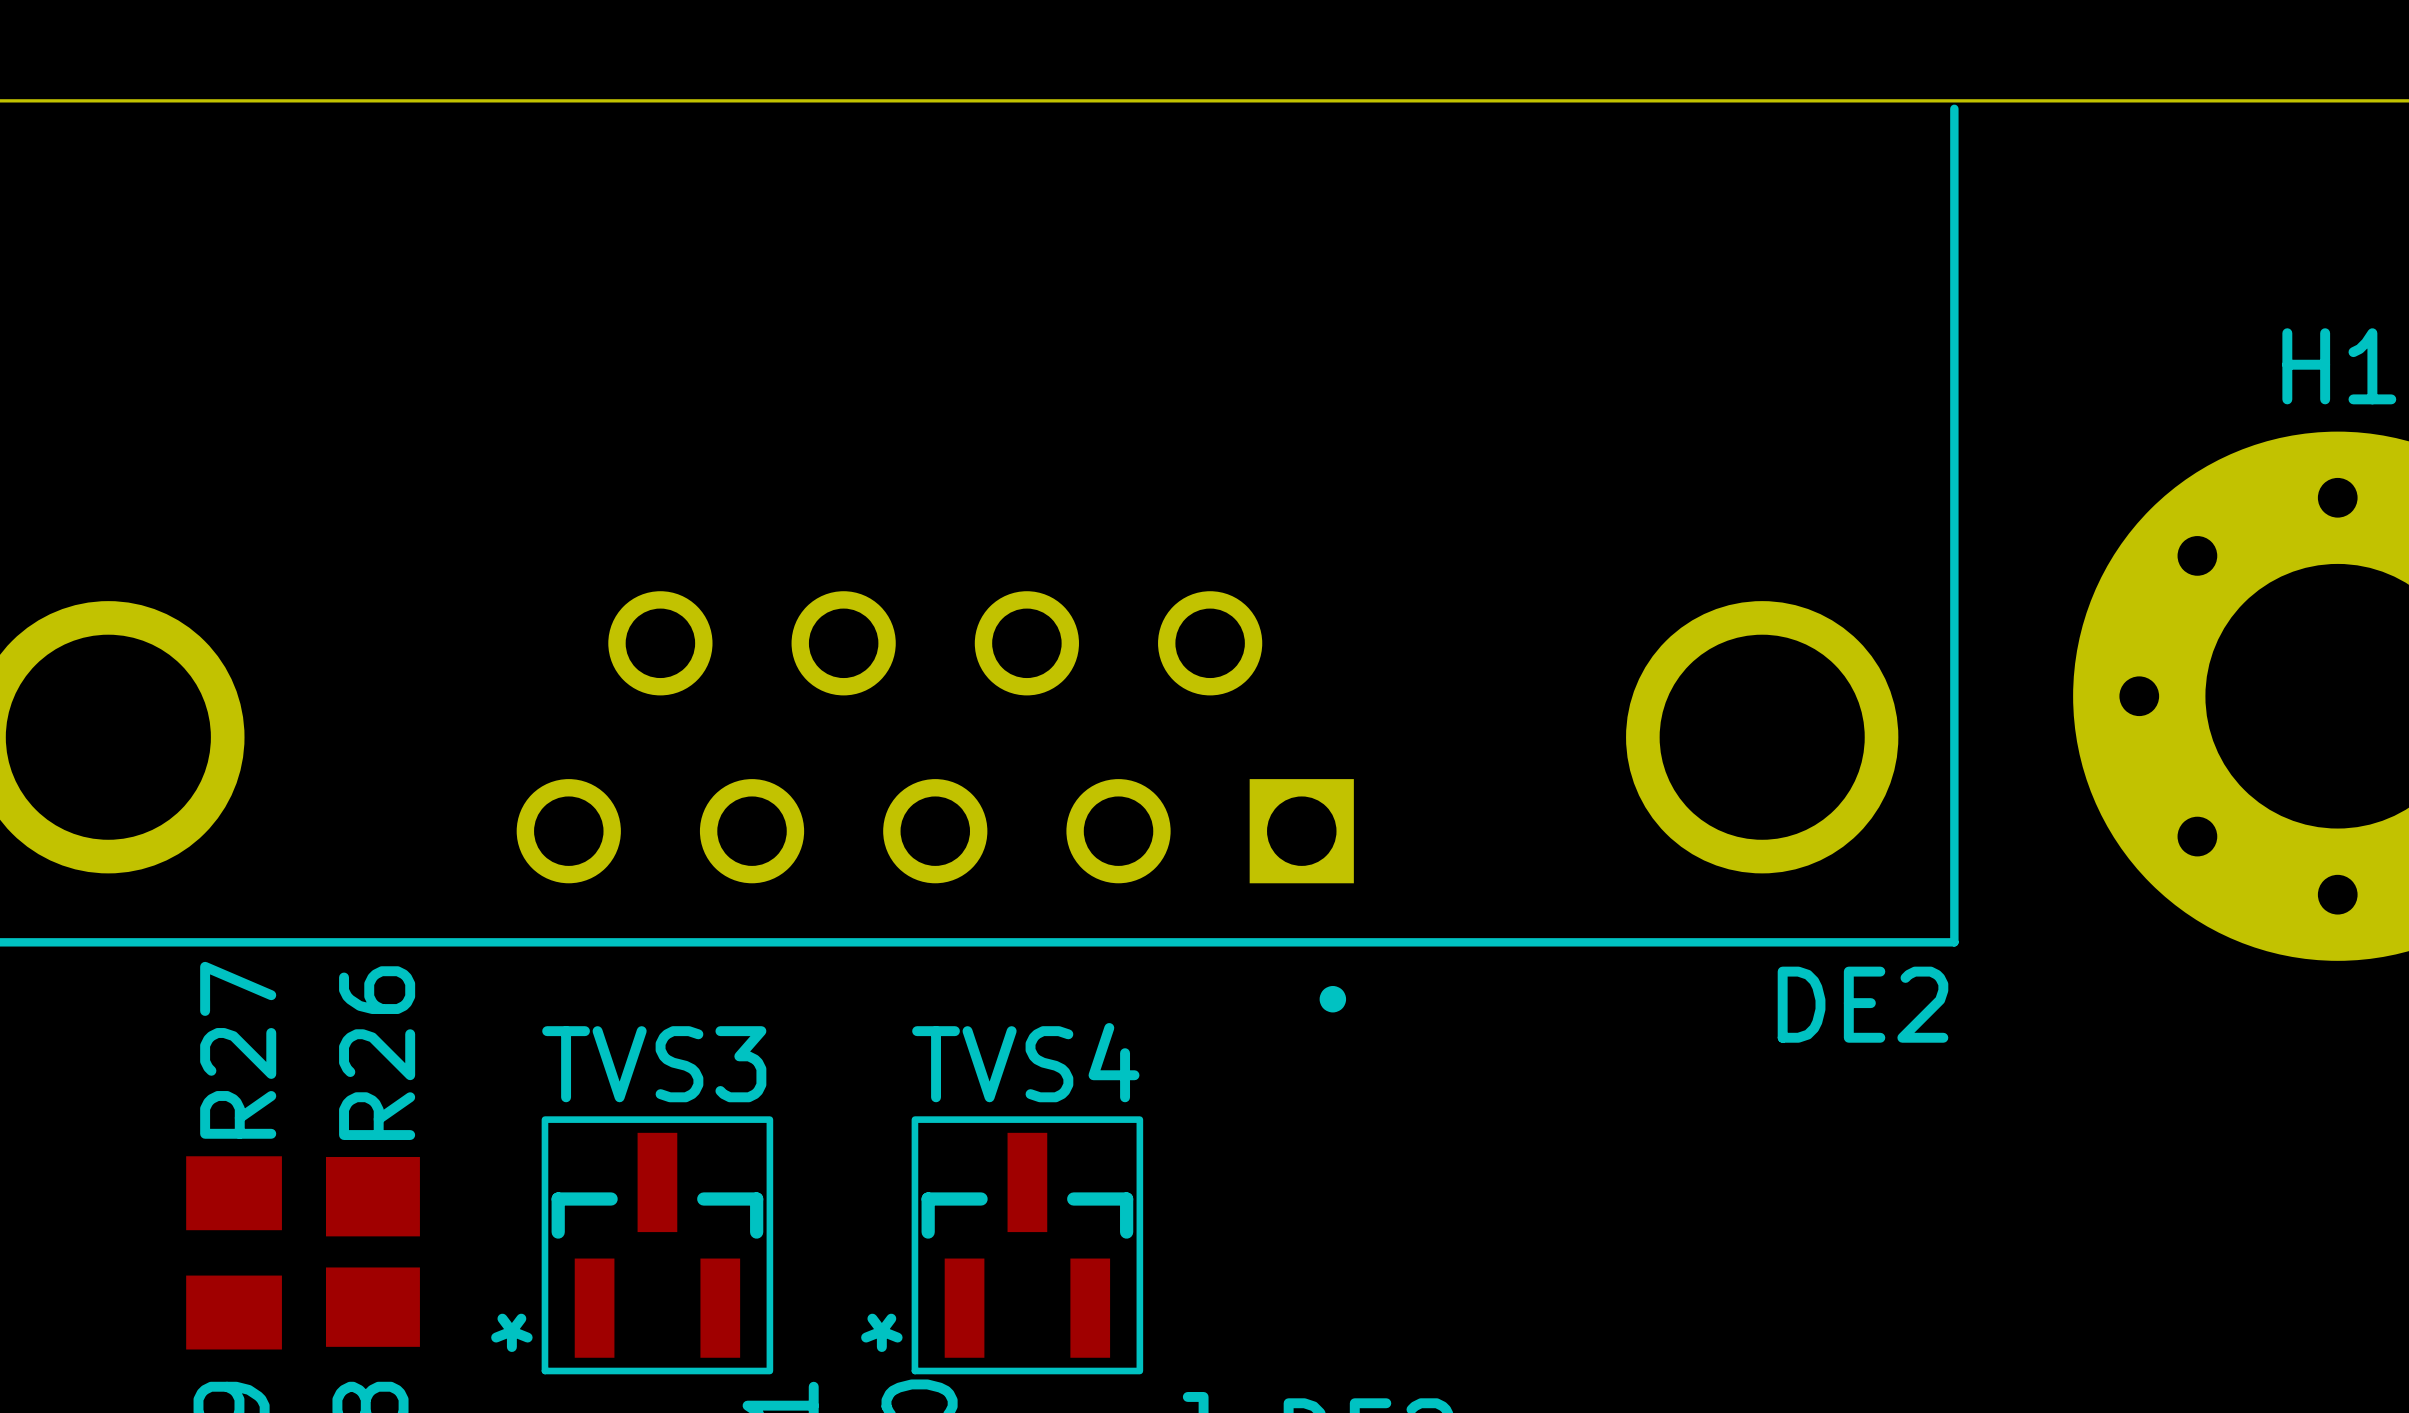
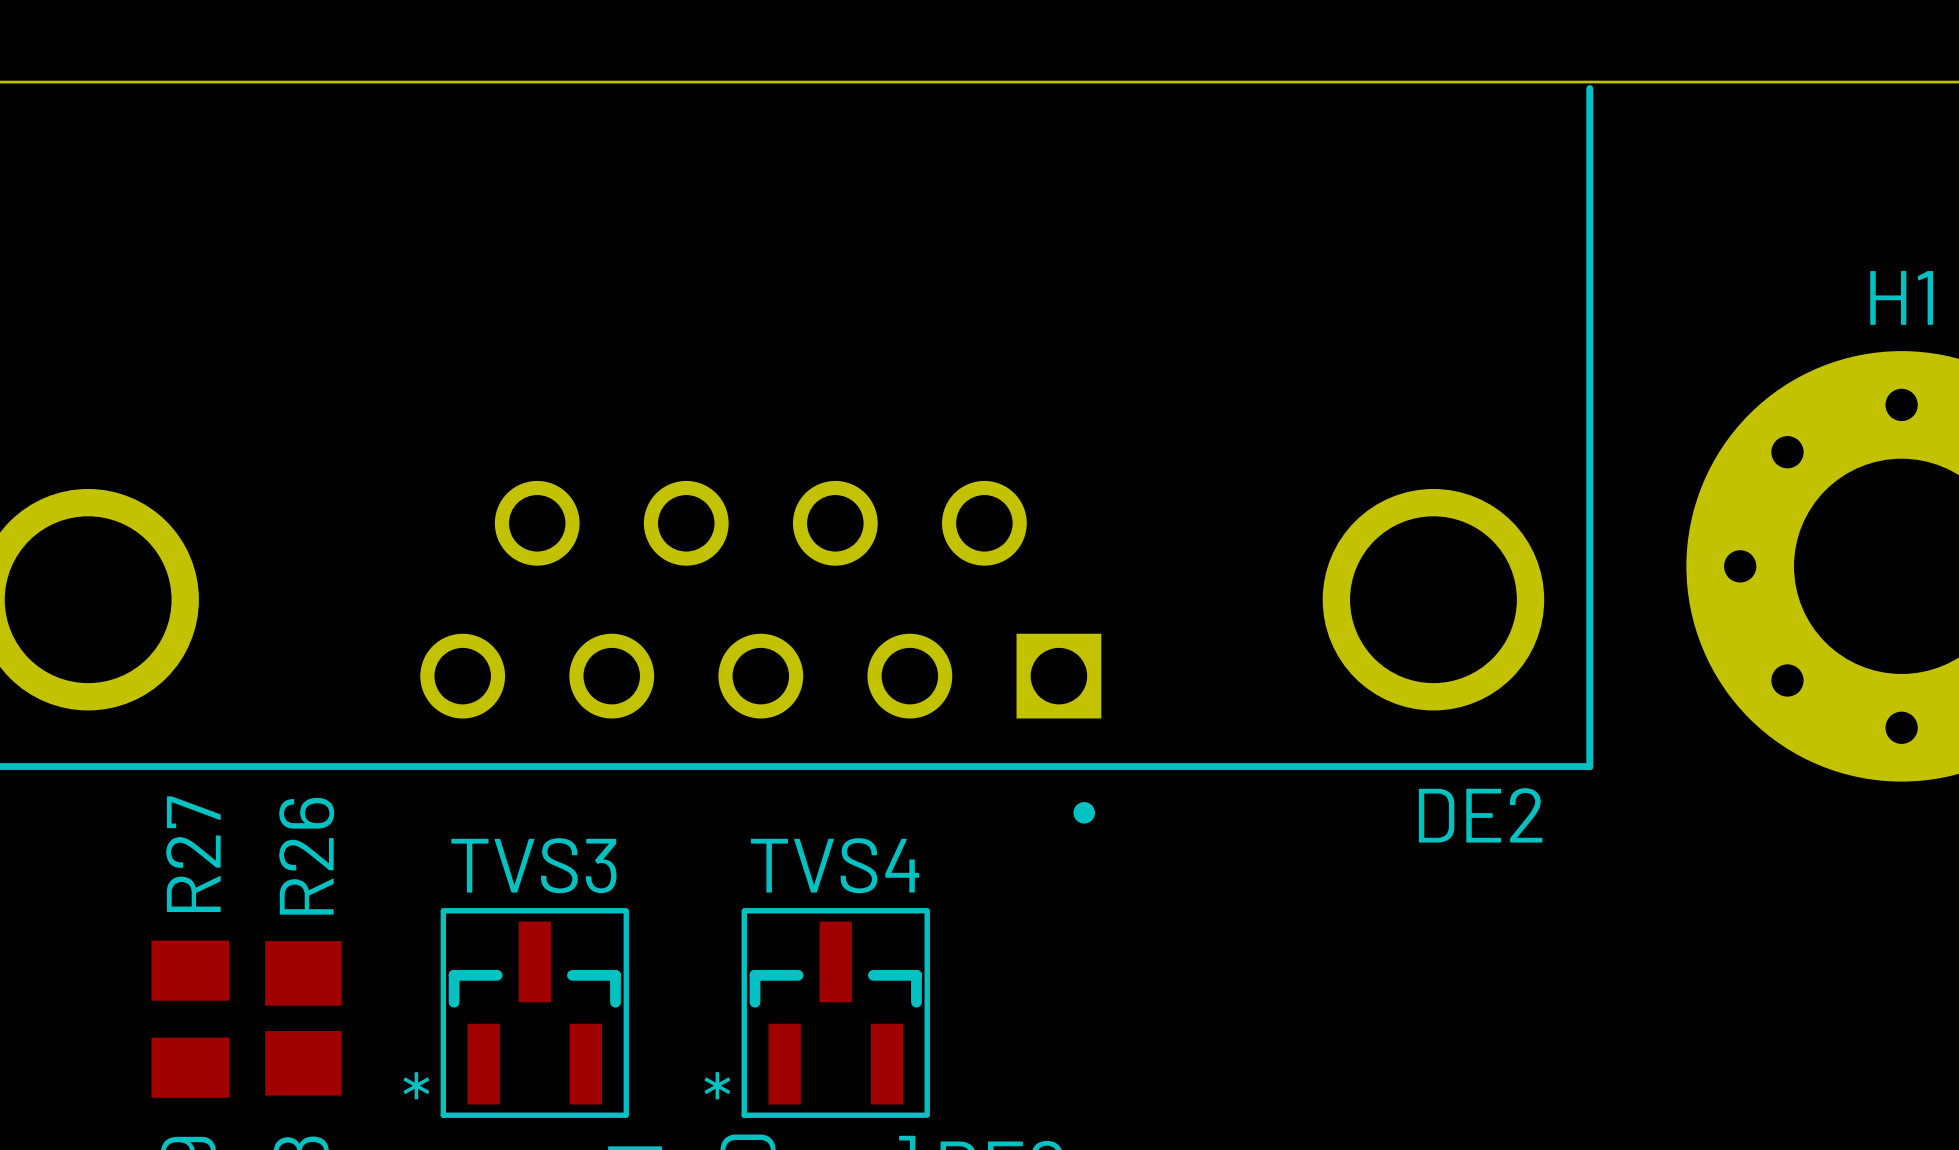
DE2 name position: DE2 (1862, 1004) -> DE2 (1480, 815)

